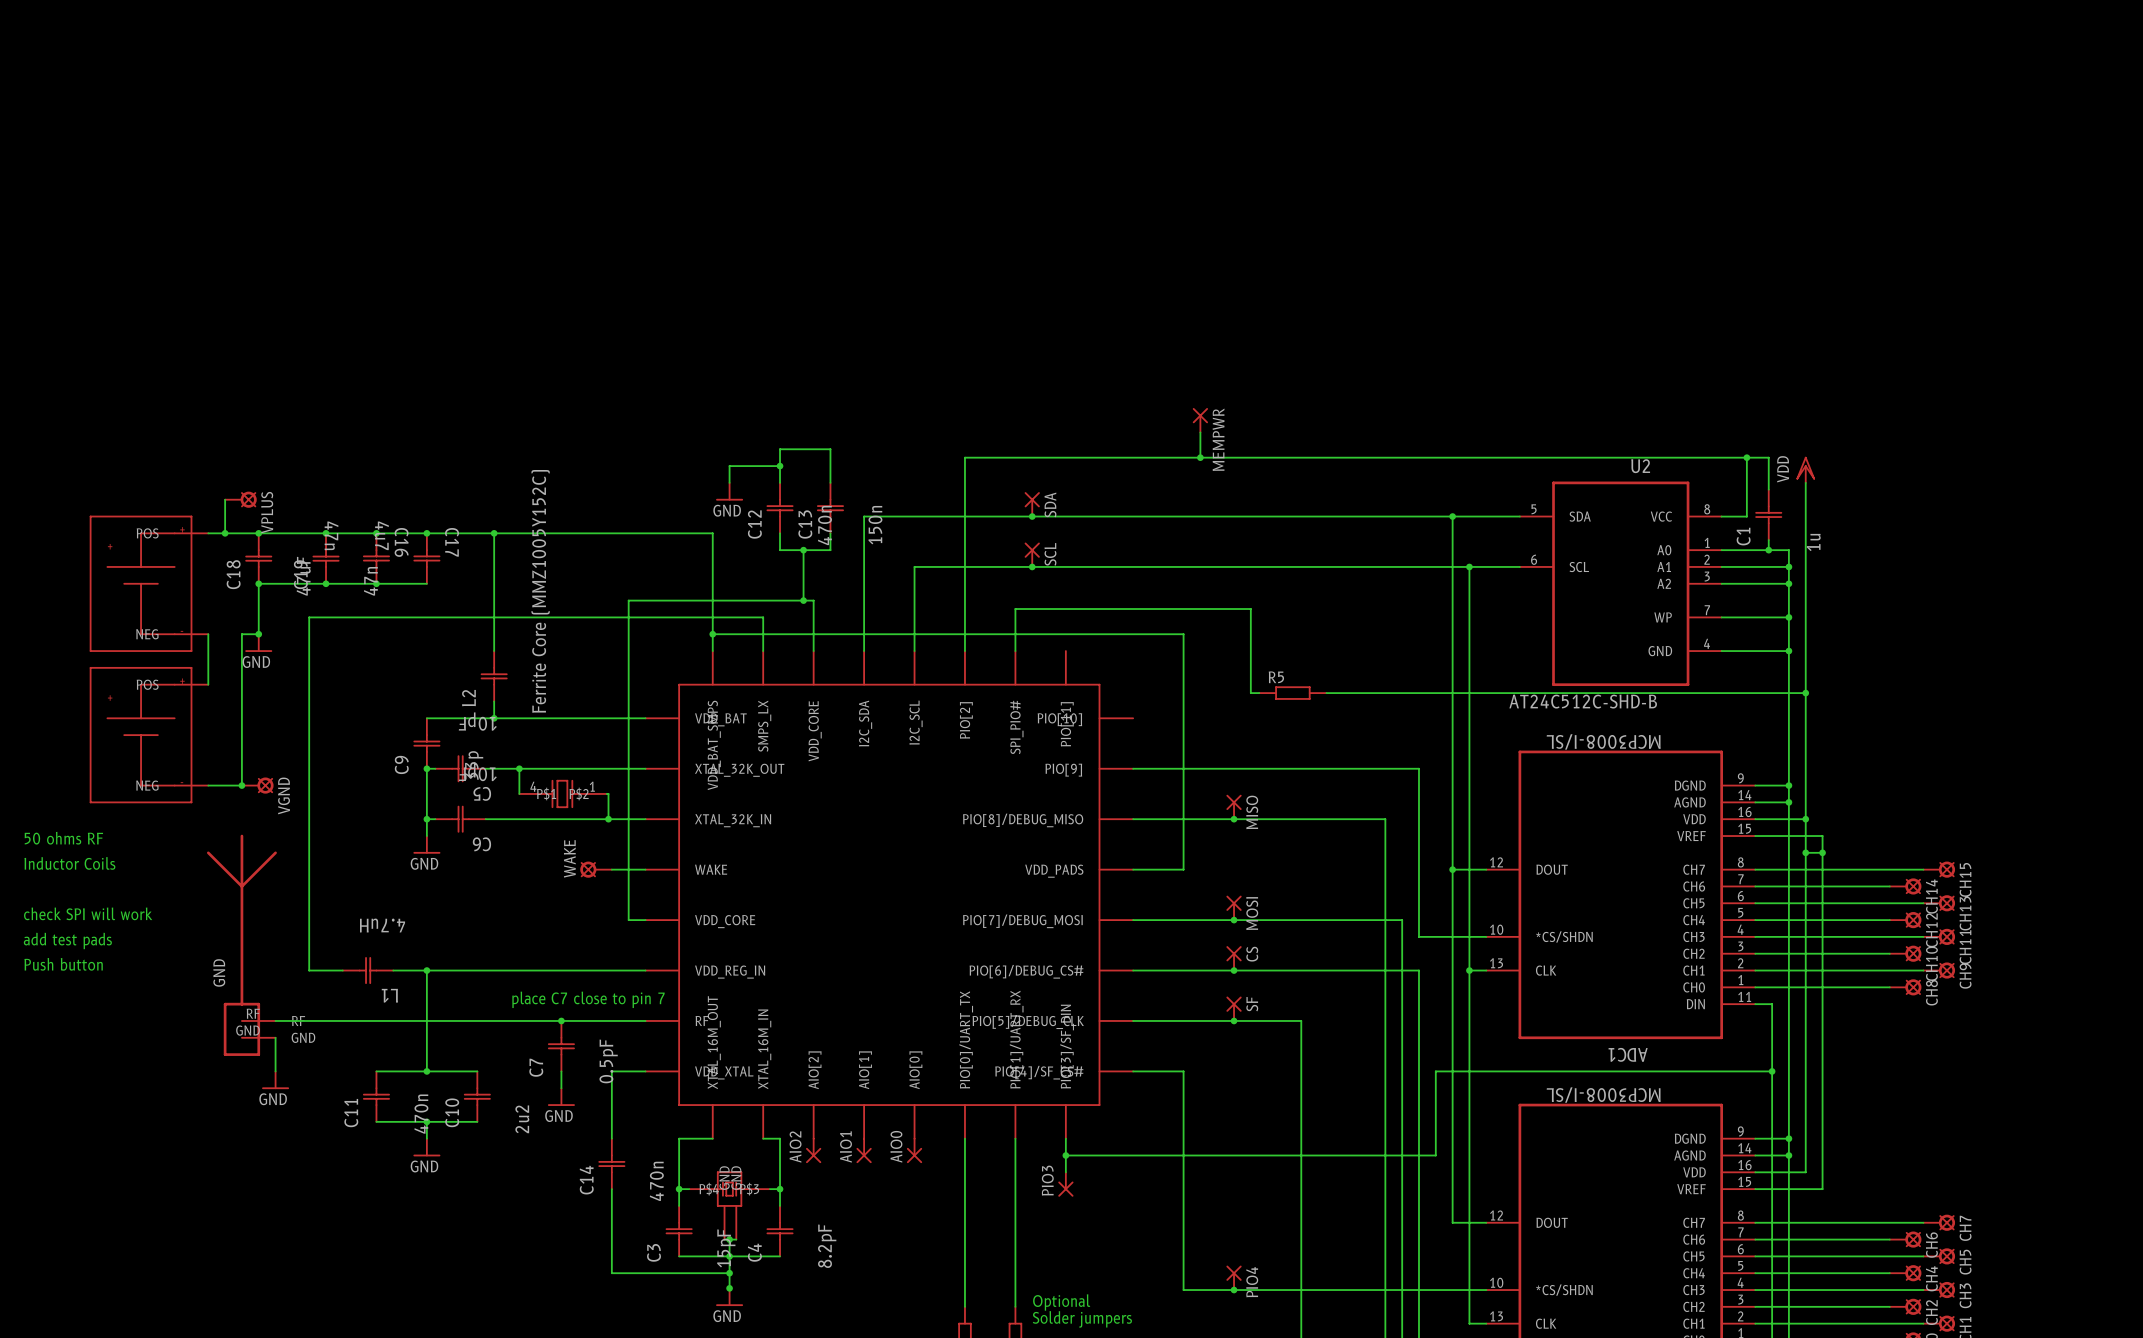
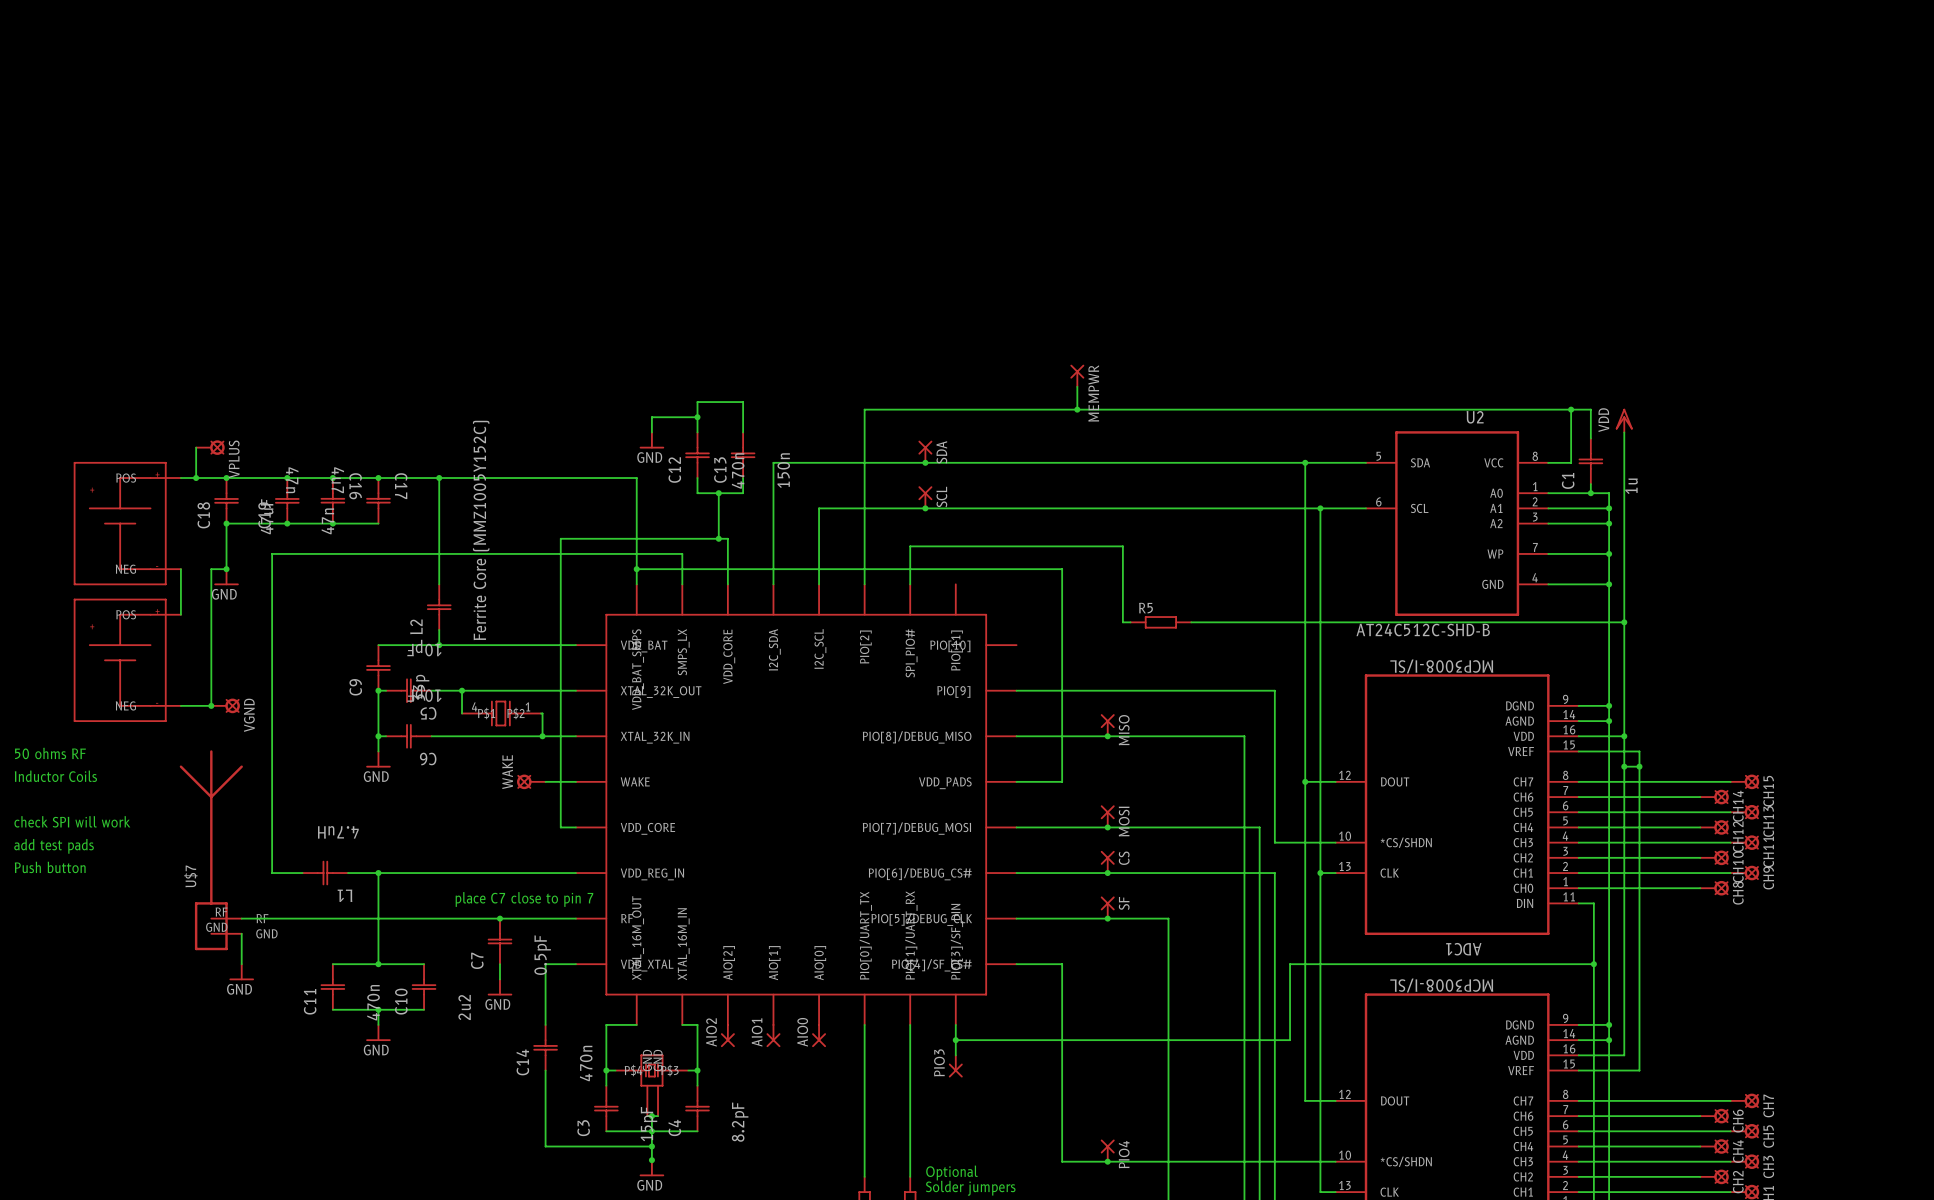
GND name: GND (219, 972) -> U$7 (190, 876)

